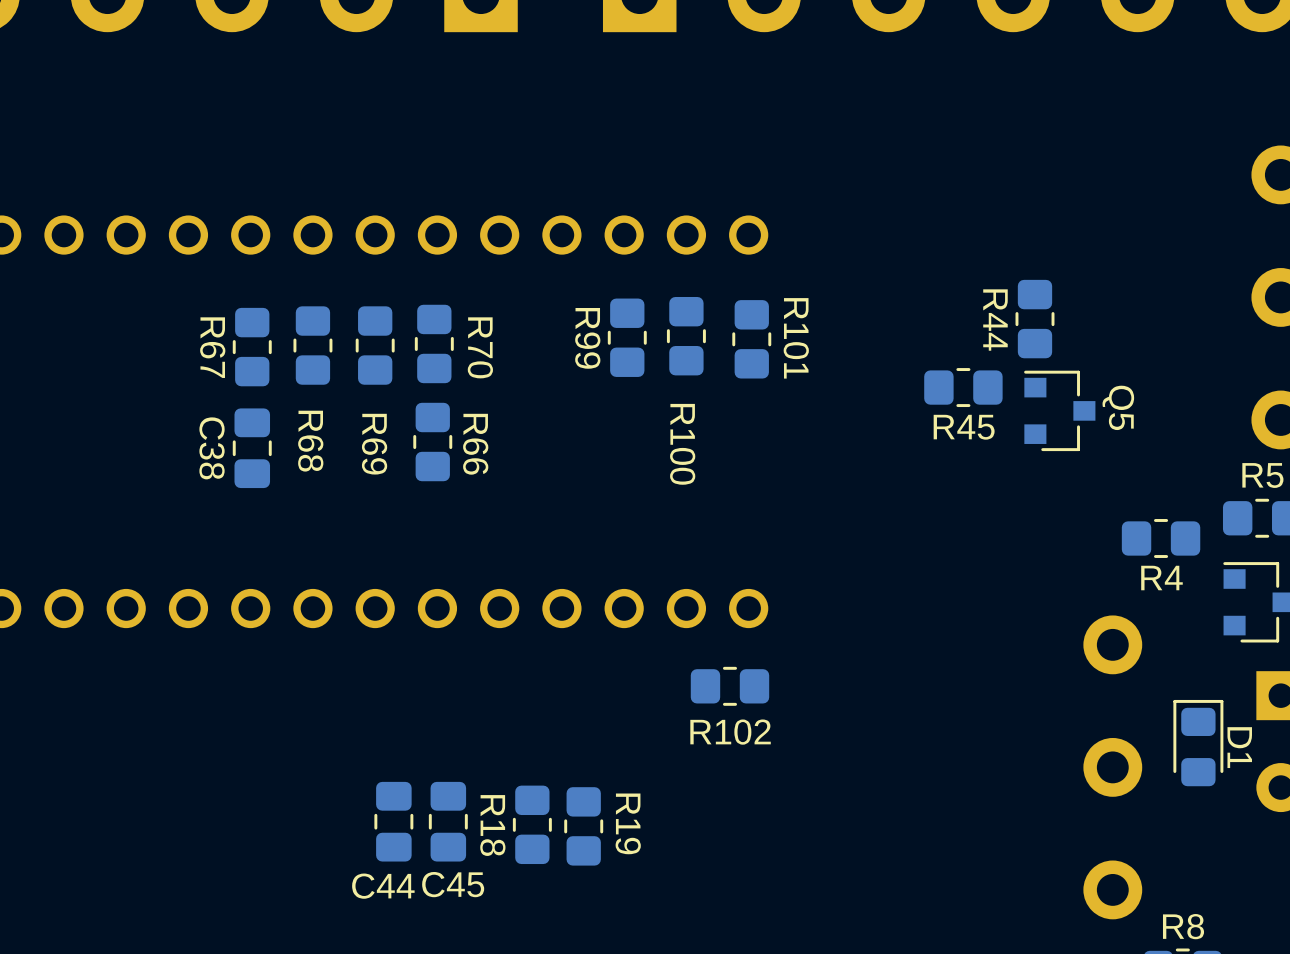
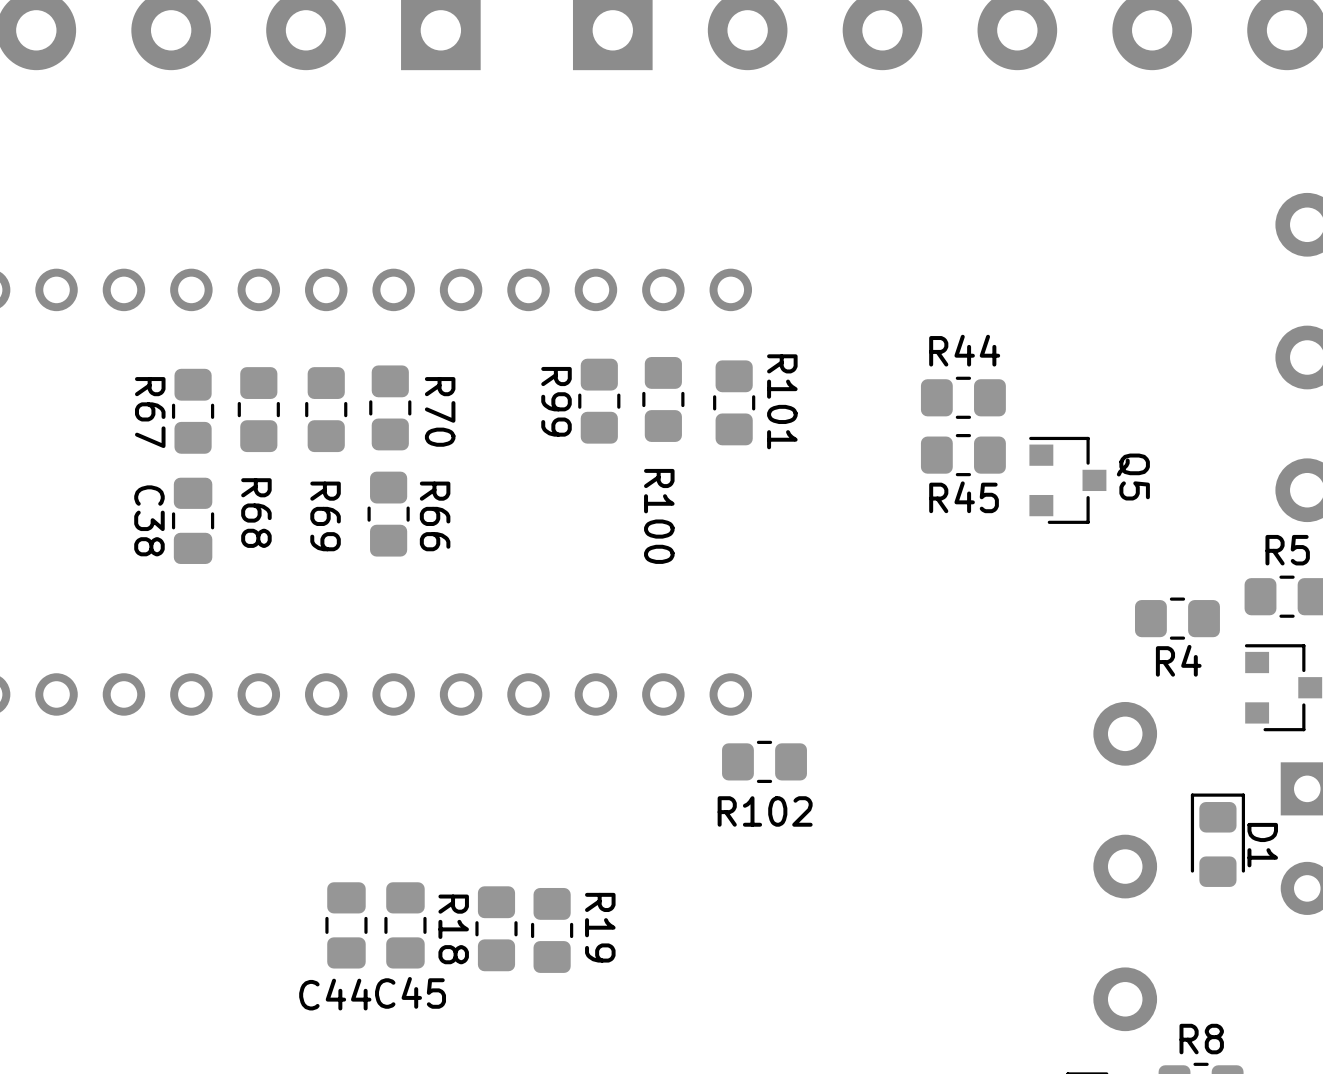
R44 rotation: 0° (1034, 319) -> 90° clockwise (963, 397)
R44 position: (1034, 319) -> (963, 397)
R102 position: (729, 686) -> (764, 761)

